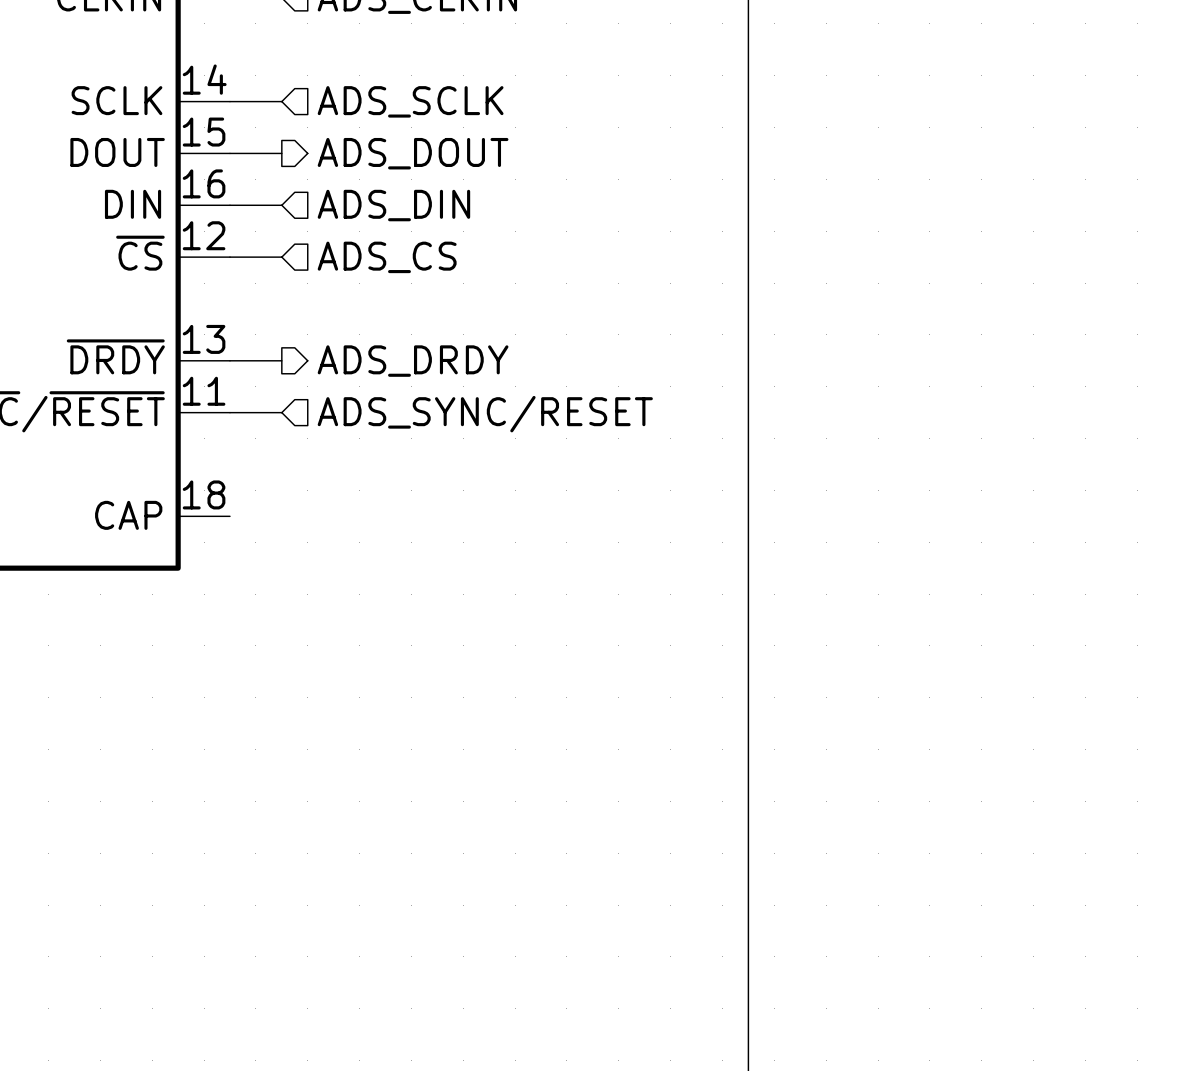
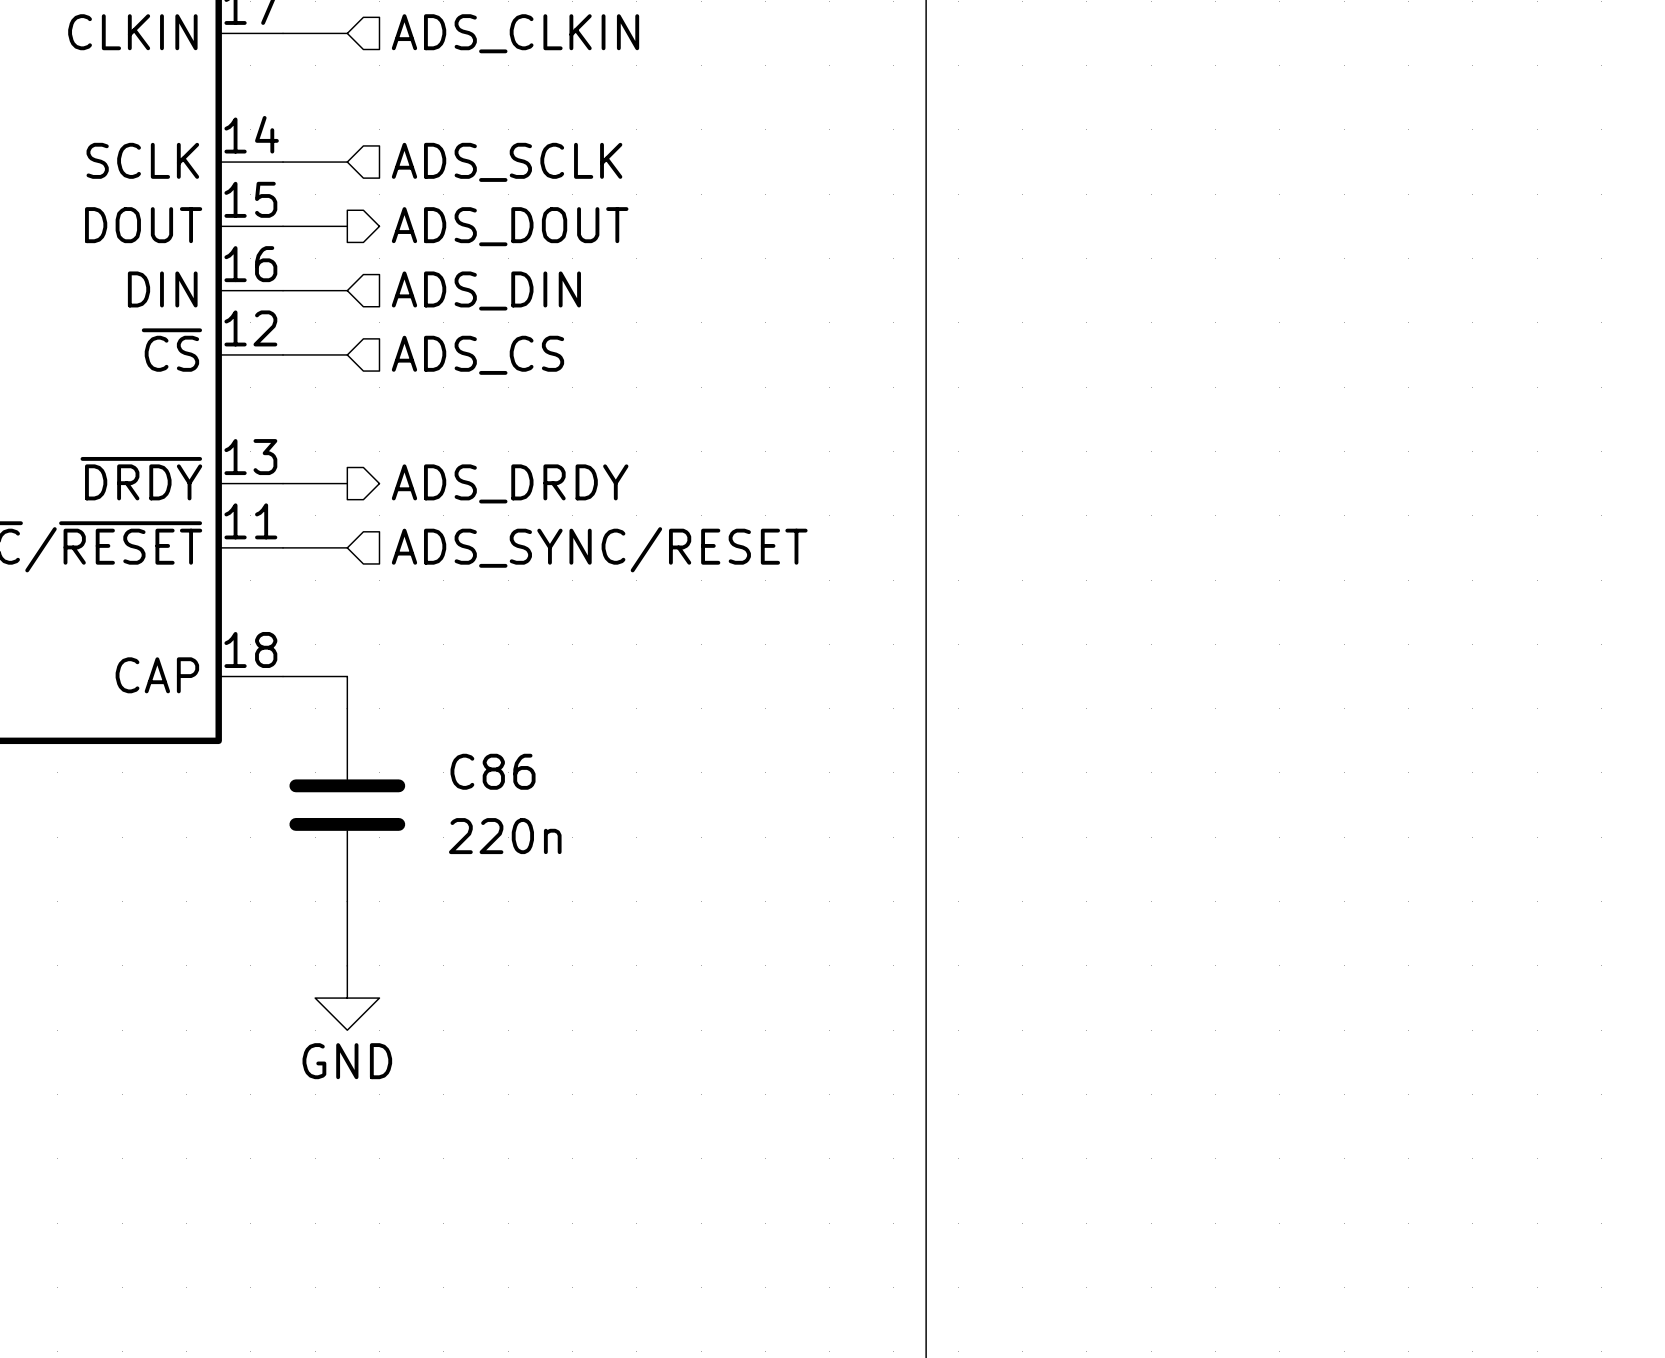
wire: none -> (283, 676) (347, 676) (347, 708)
C86: none -> 220n (347, 805)
wire: none -> (347, 901) (347, 965)
power symbol: none -> GND (347, 998)

